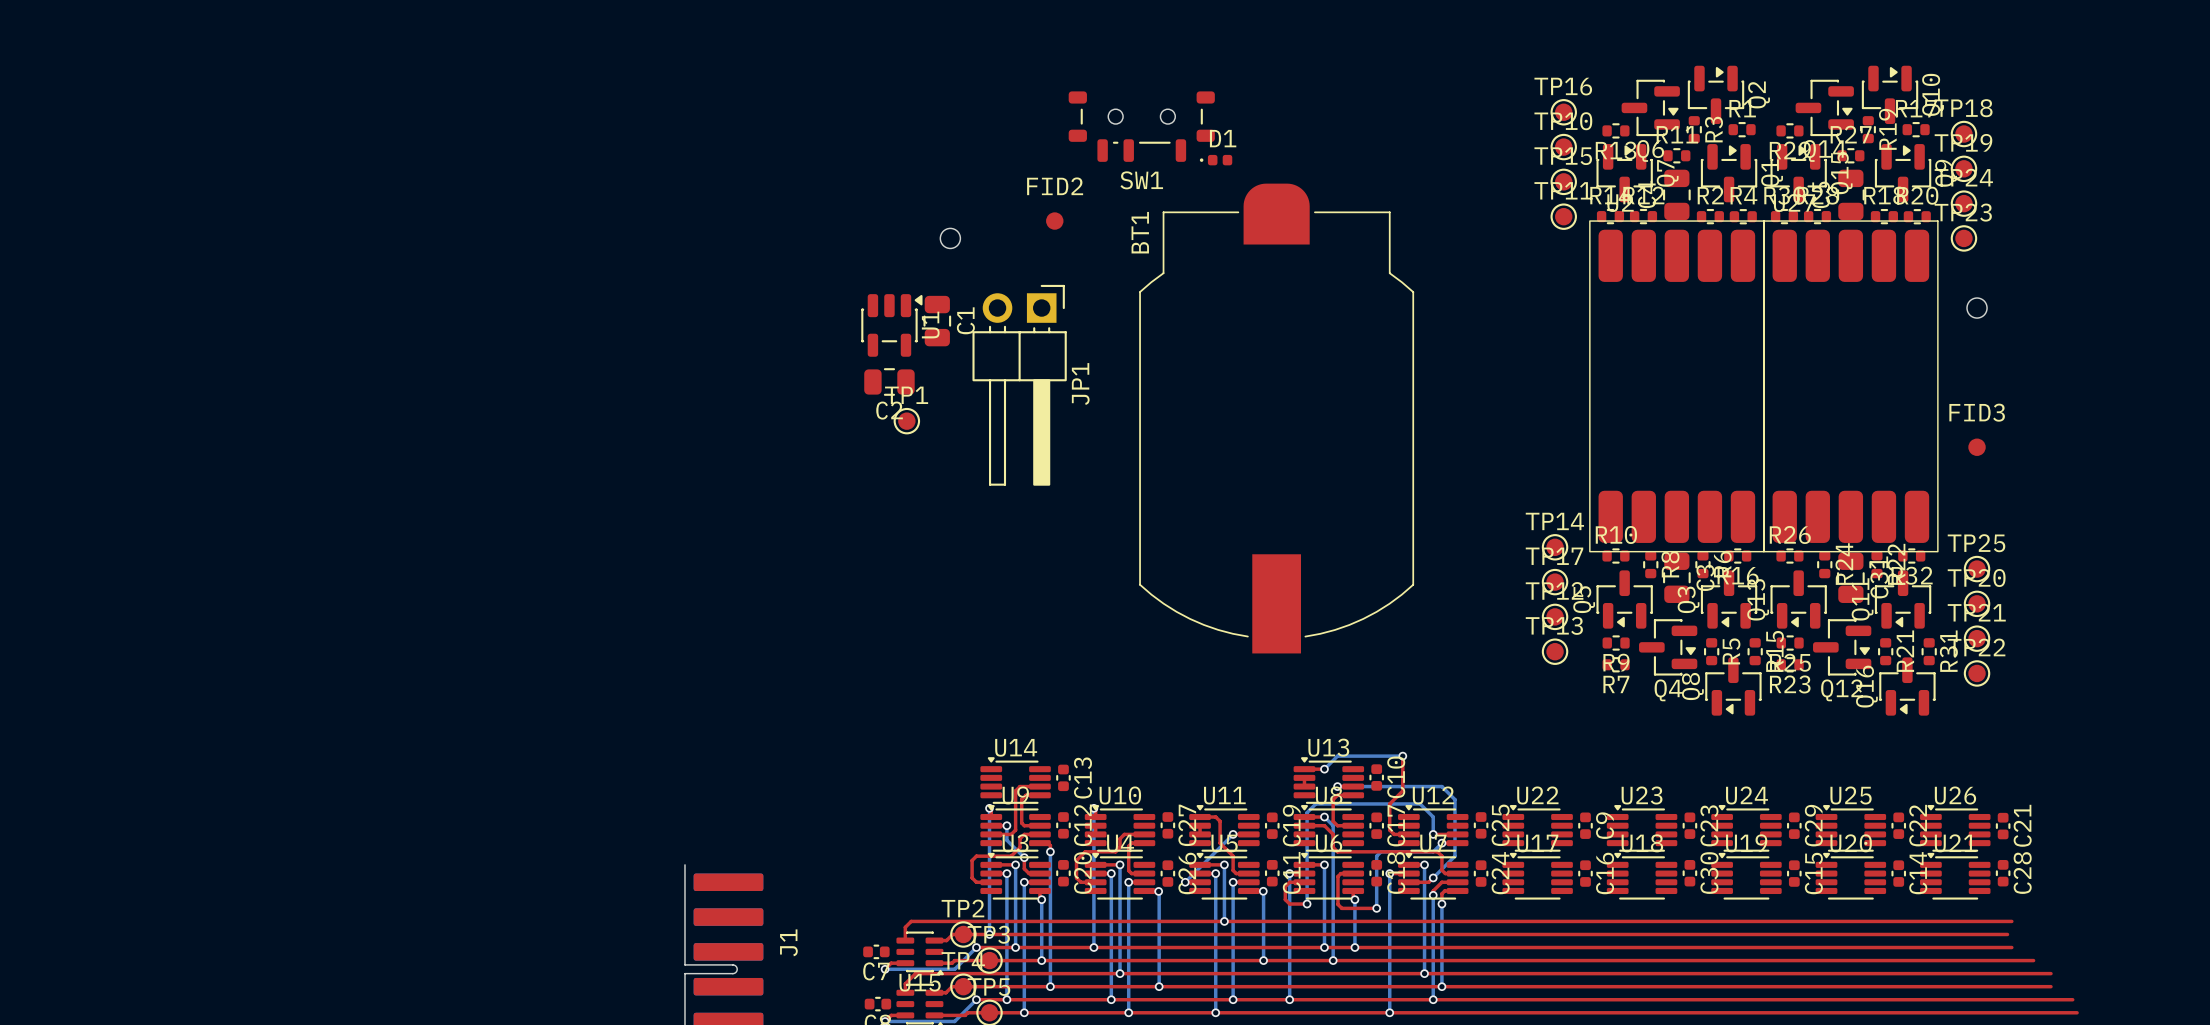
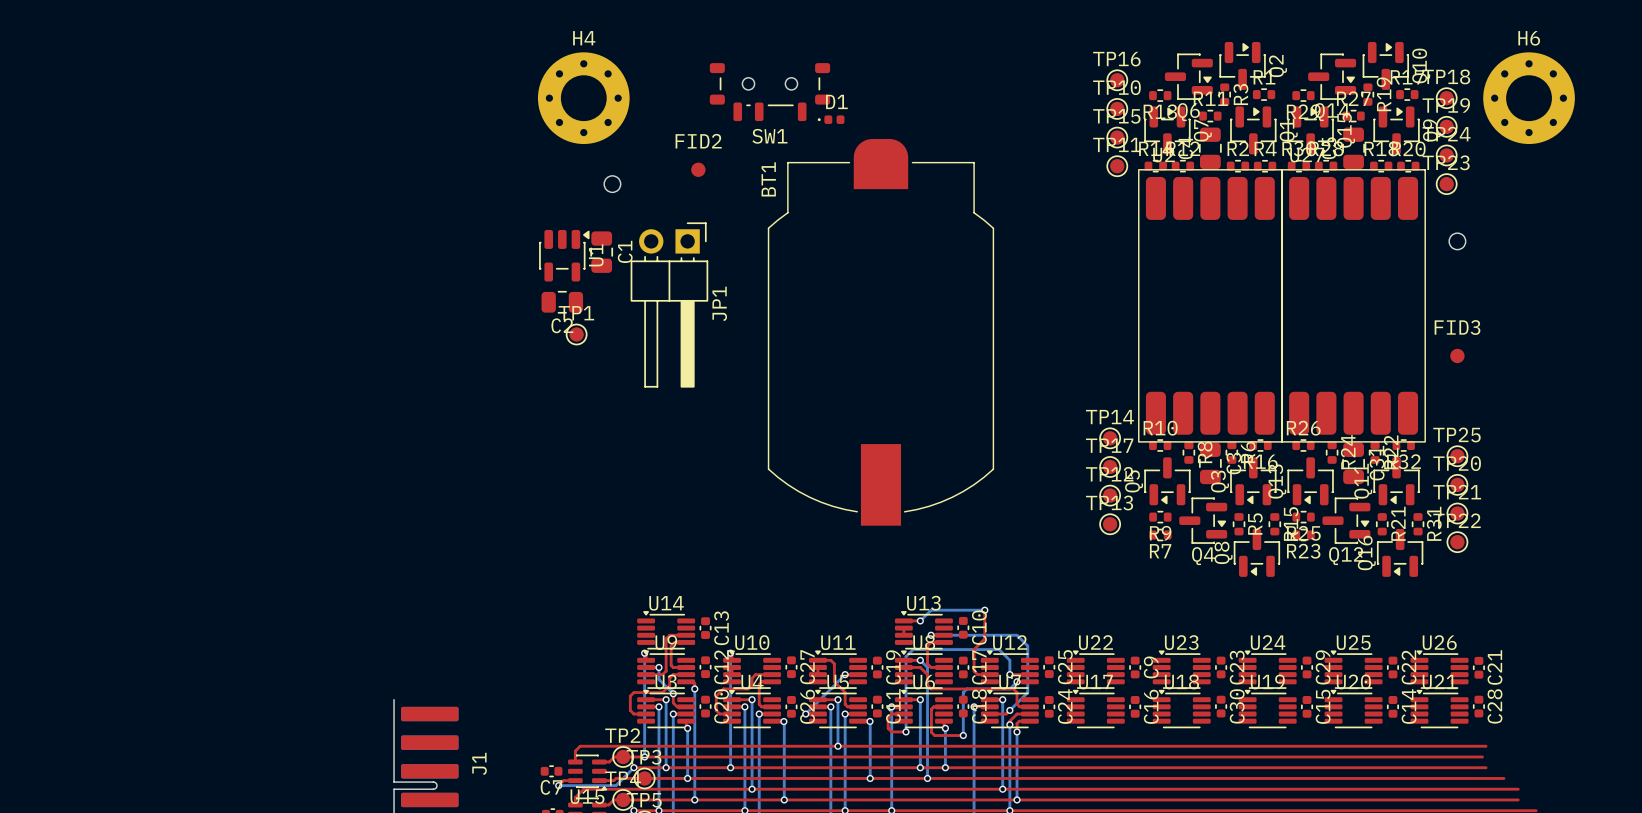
H4: none -> (583, 98)
H6: none -> (1529, 98)

